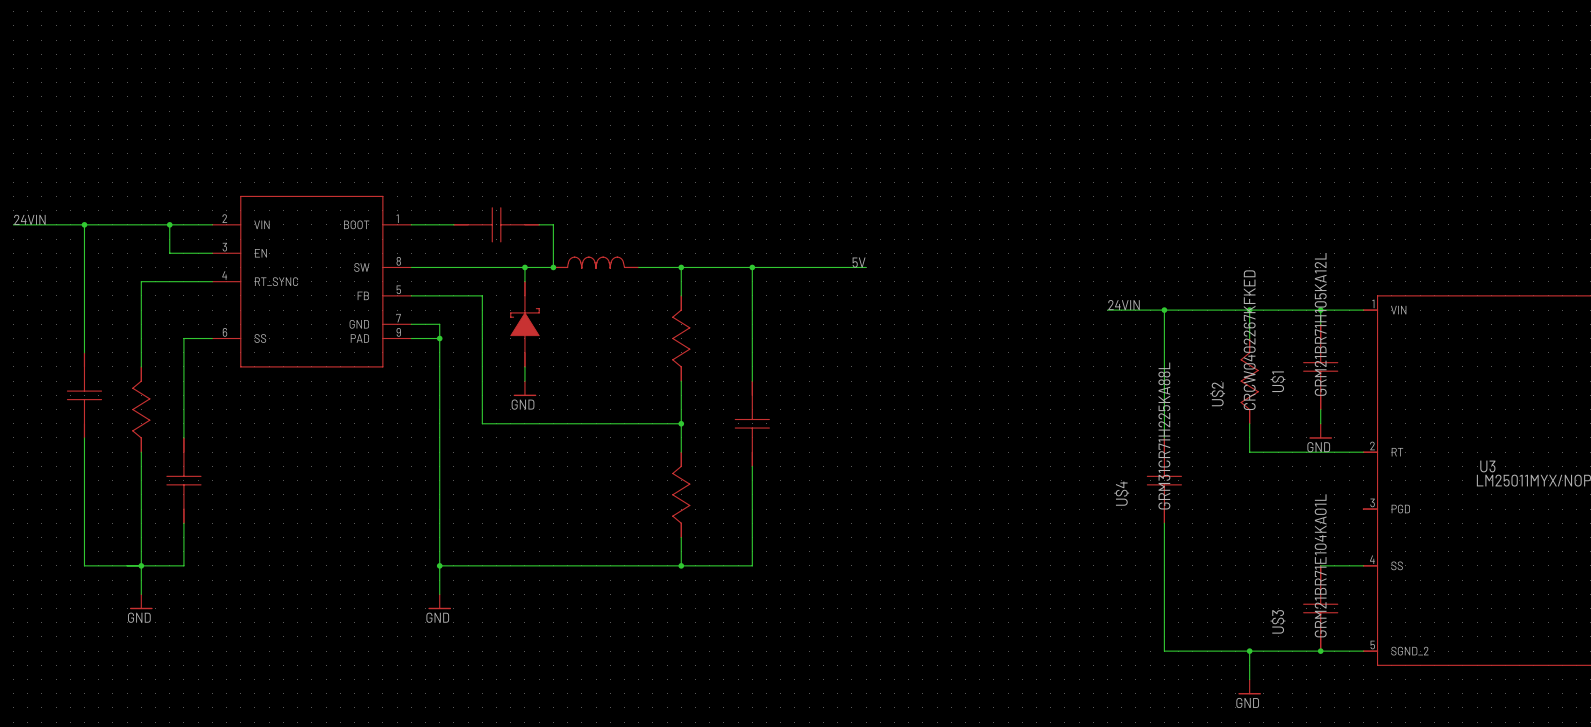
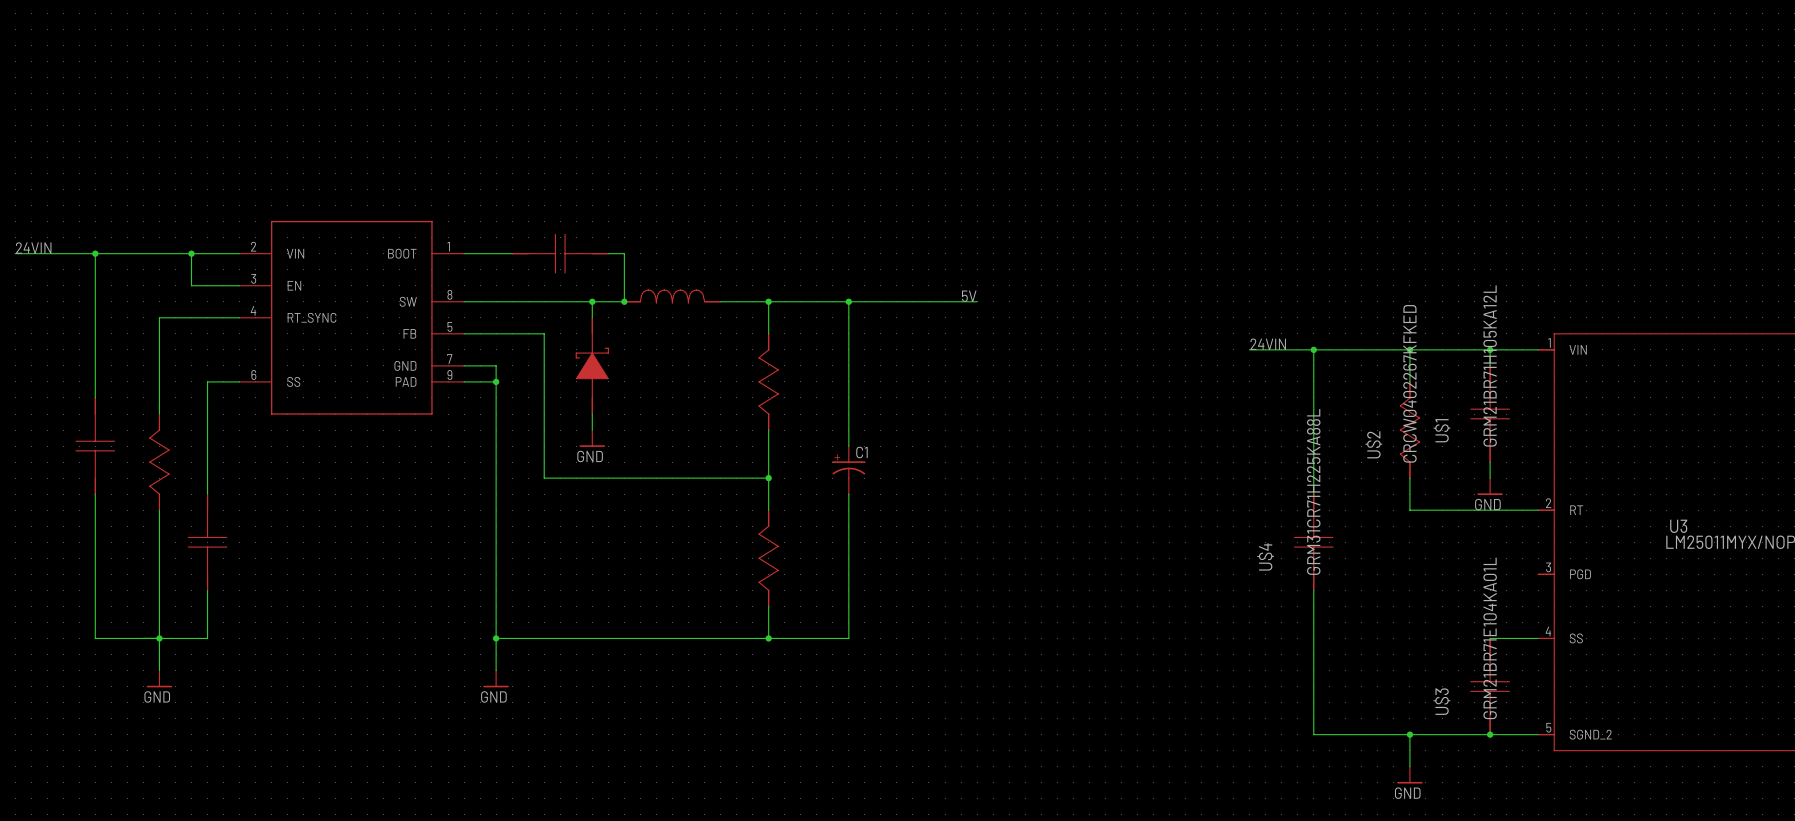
C1: none -> (848, 470)
part: (752, 423) -> none

